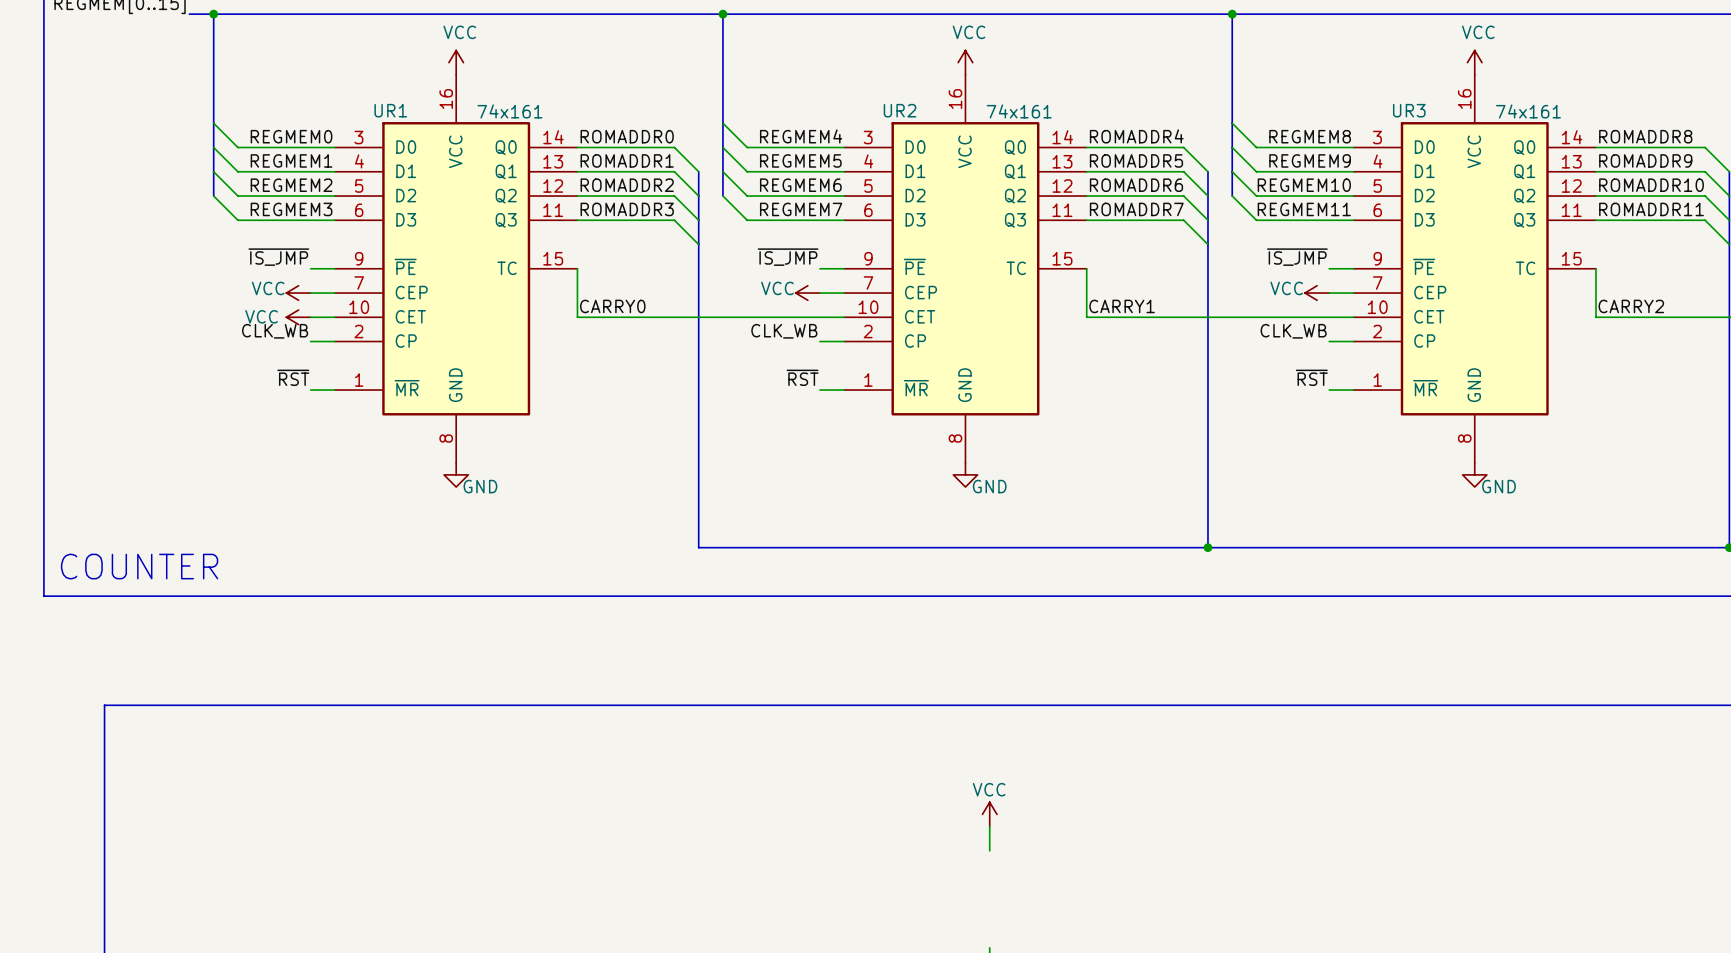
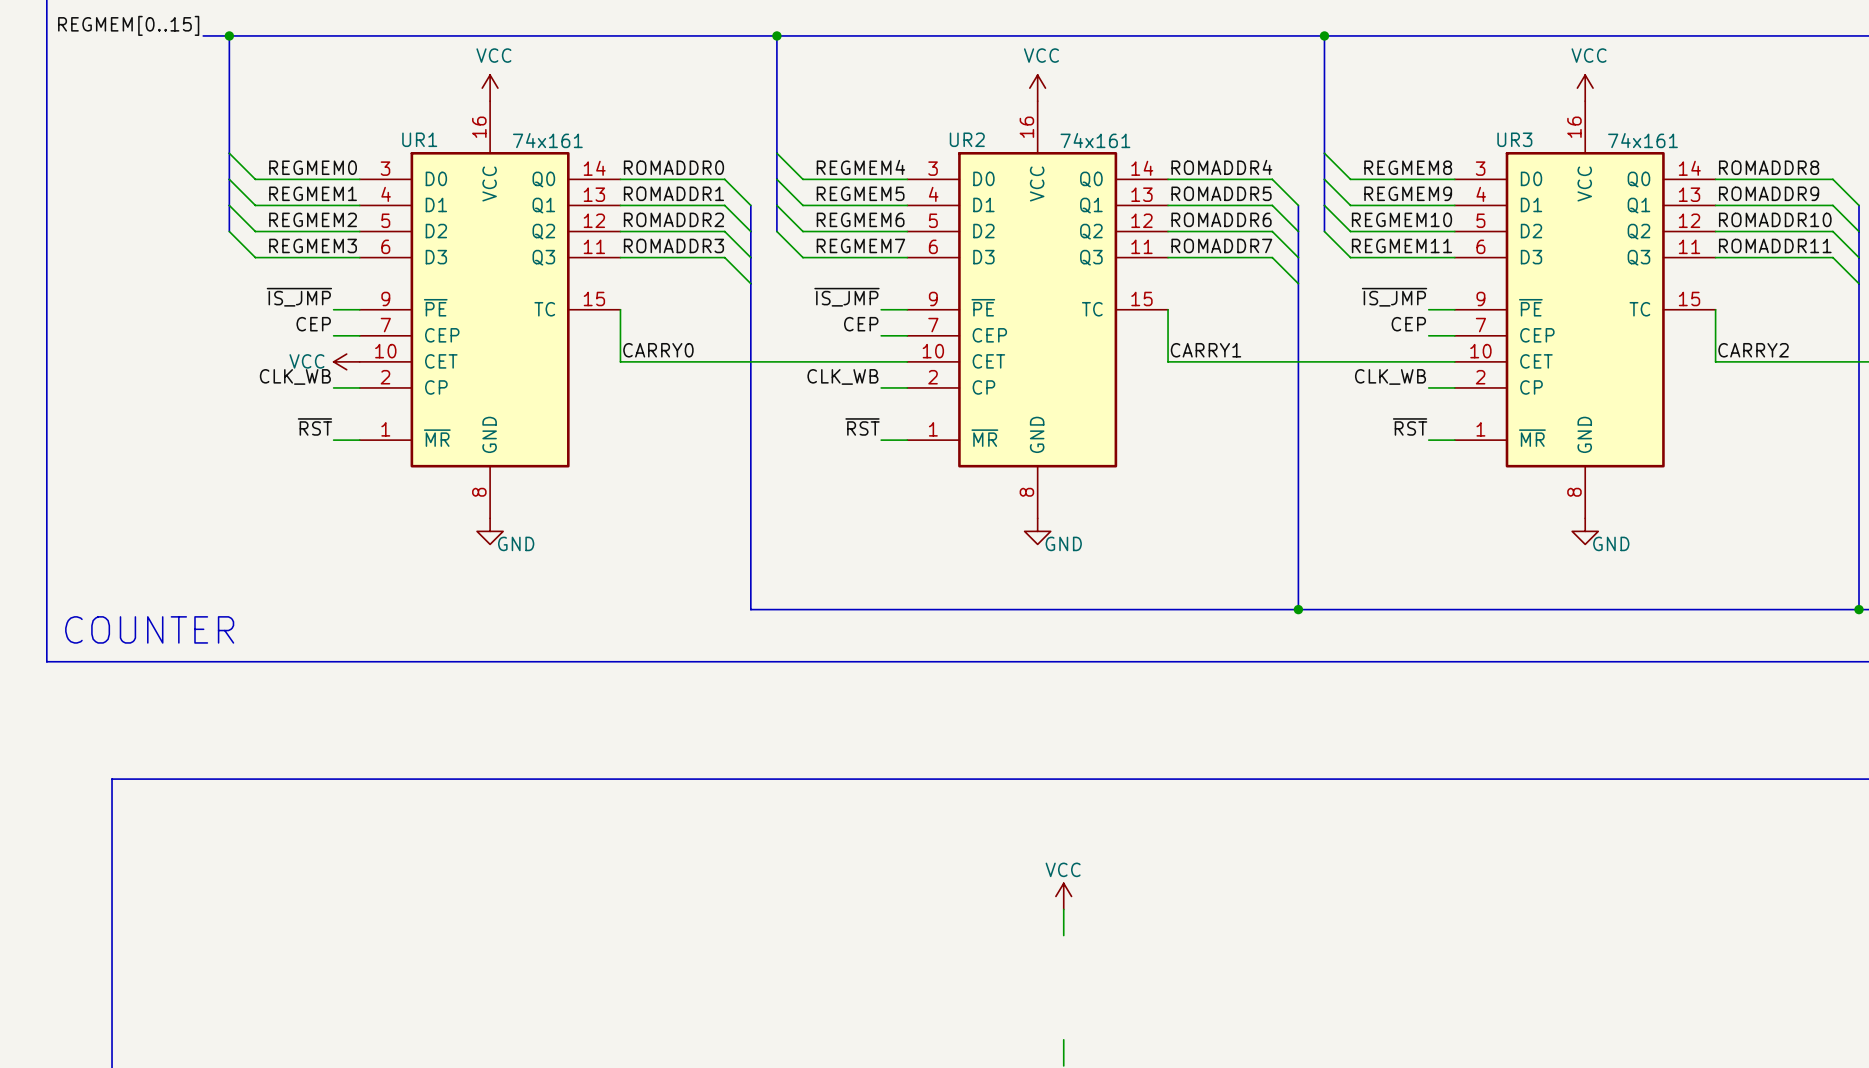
label: none -> CEP (313, 324)
label: none -> CEP (861, 324)
label: none -> CEP (1408, 324)
power symbol: VCC (298, 293) -> none
power symbol: VCC (807, 293) -> none
power symbol: VCC (1317, 293) -> none
power symbol: VCC (298, 317) -> none
power symbol: none -> VCC (346, 361)

